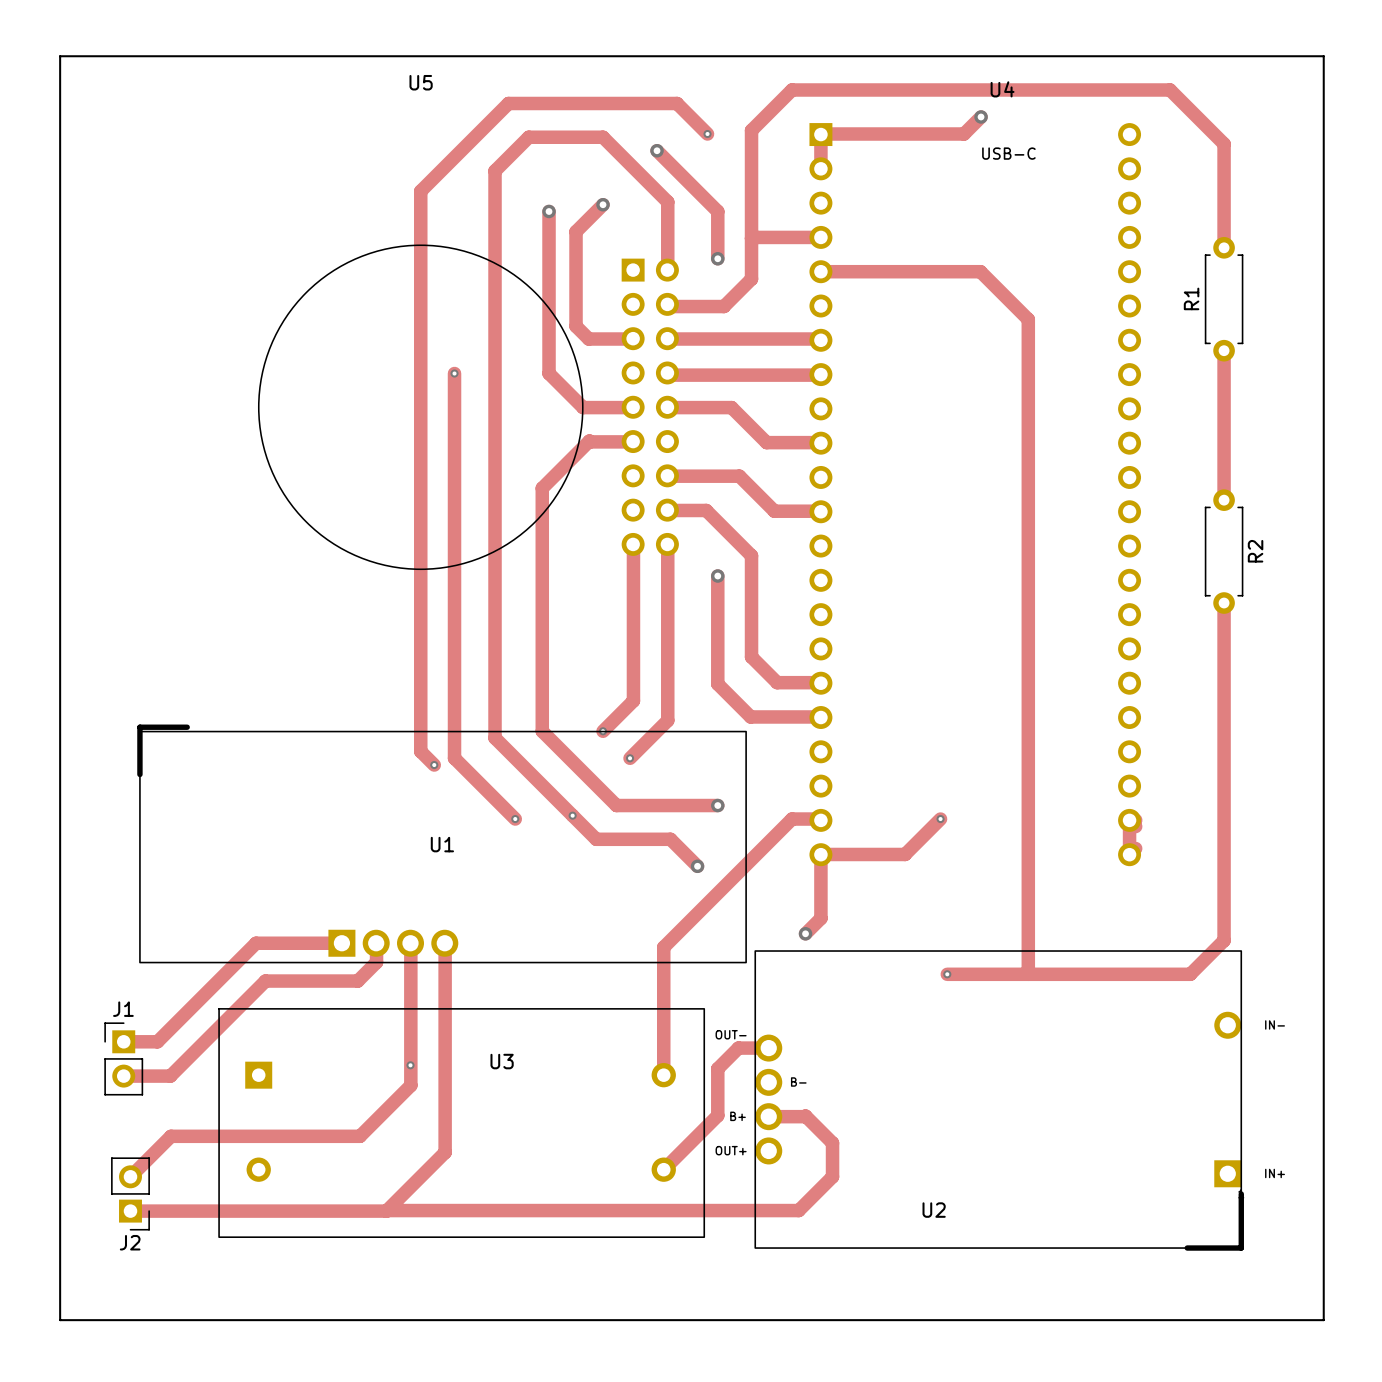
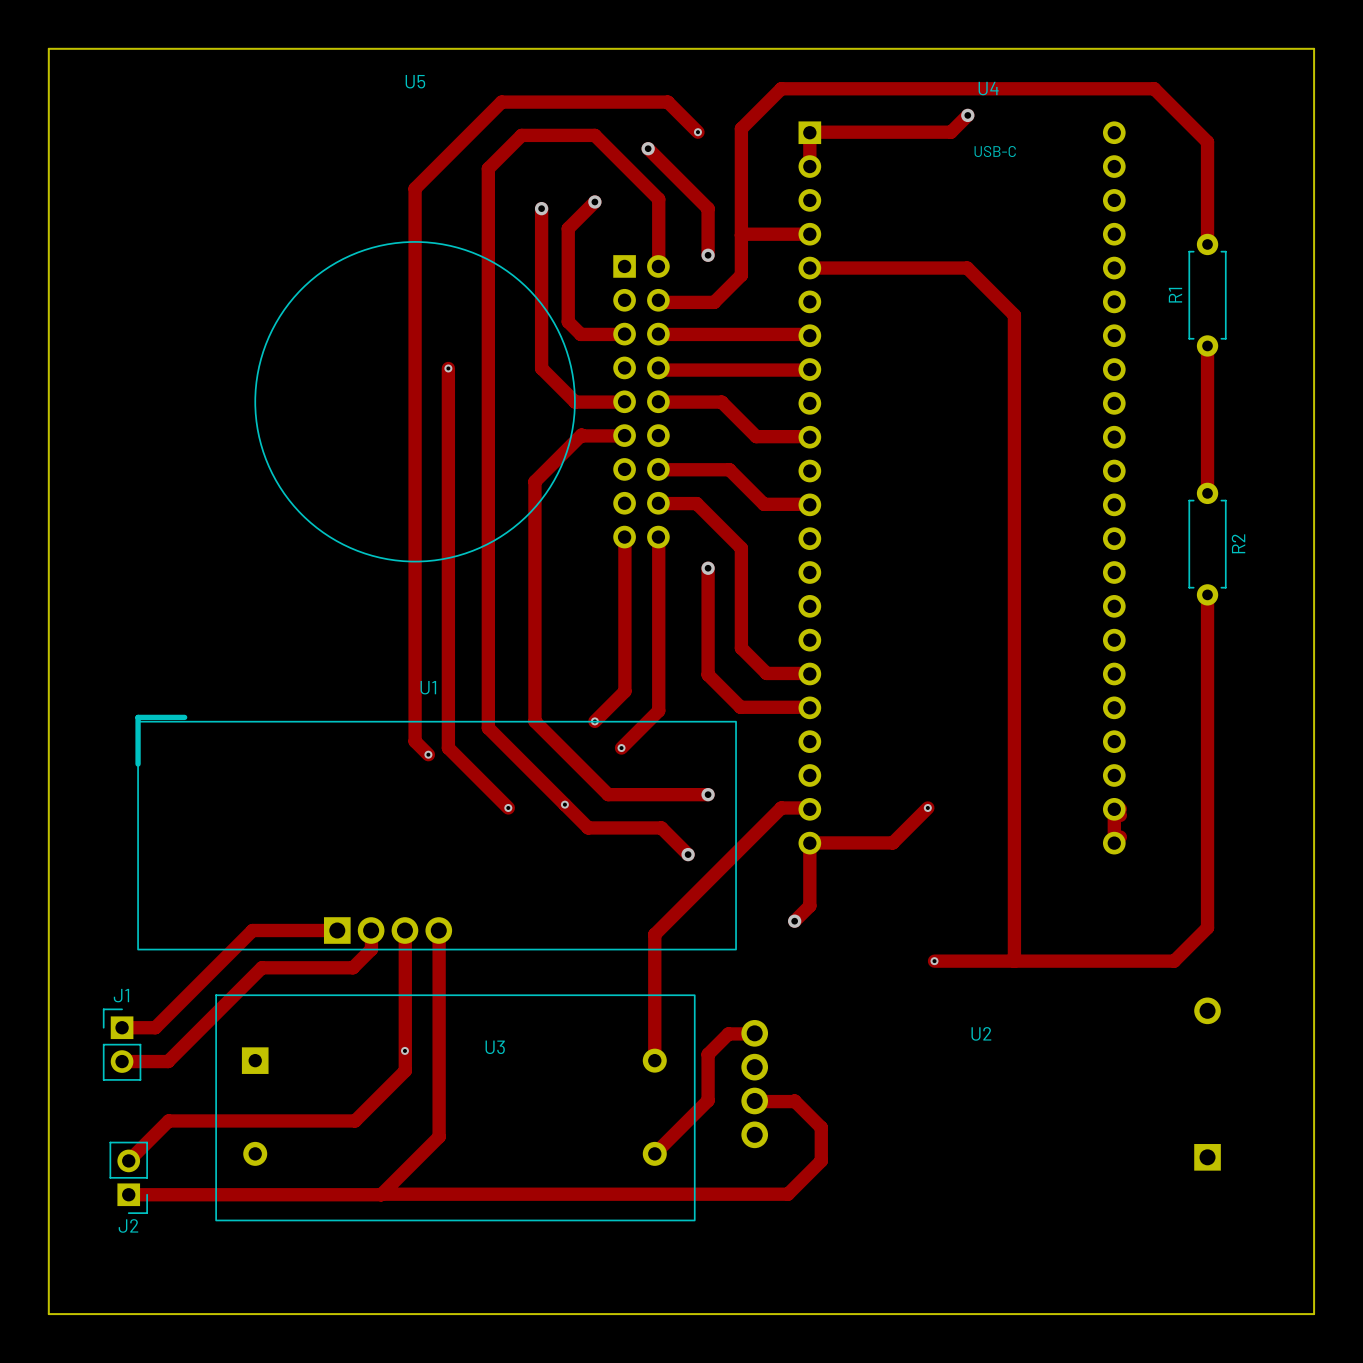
board edge: (60, 56) (1323, 56) (1323, 1320) (60, 1320) (60, 56) -> (48, 48) (48, 1314) (1314, 1314) (1314, 48) (48, 48)
U1 name position: U1 (442, 844) -> U1 (428, 687)
U2 footprint: [754, 950, 1244, 1251] -> [741, 997, 1221, 1171]
U2 name position: U2 (934, 1210) -> U2 (981, 1033)

